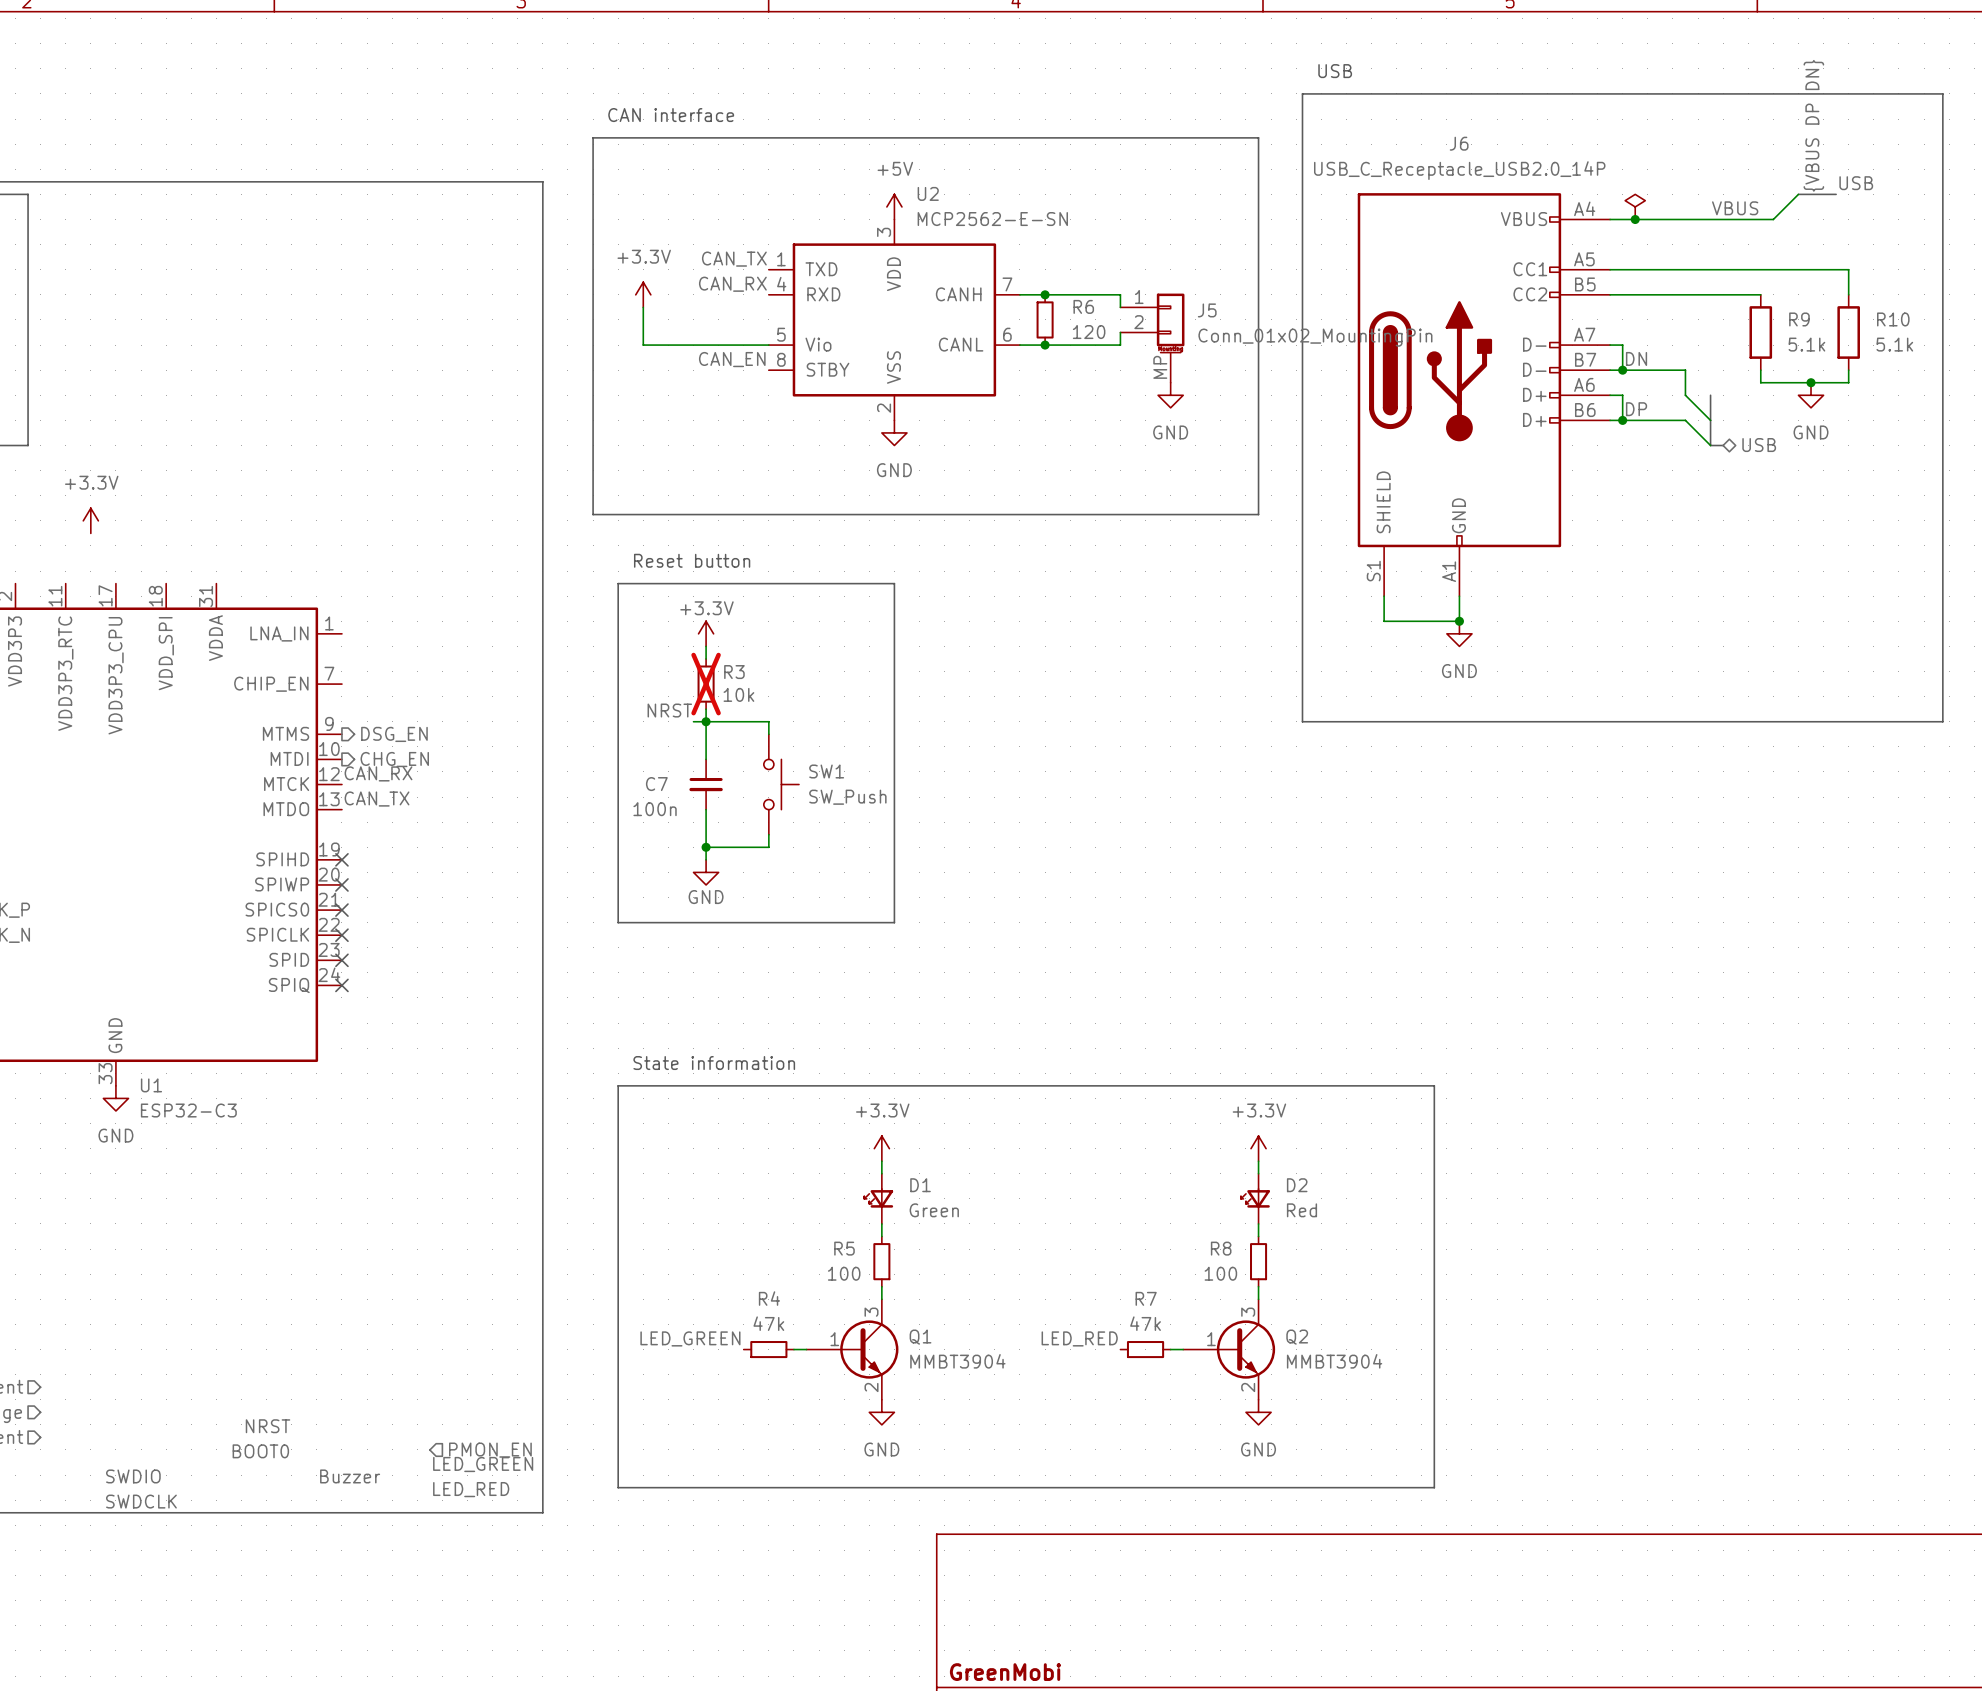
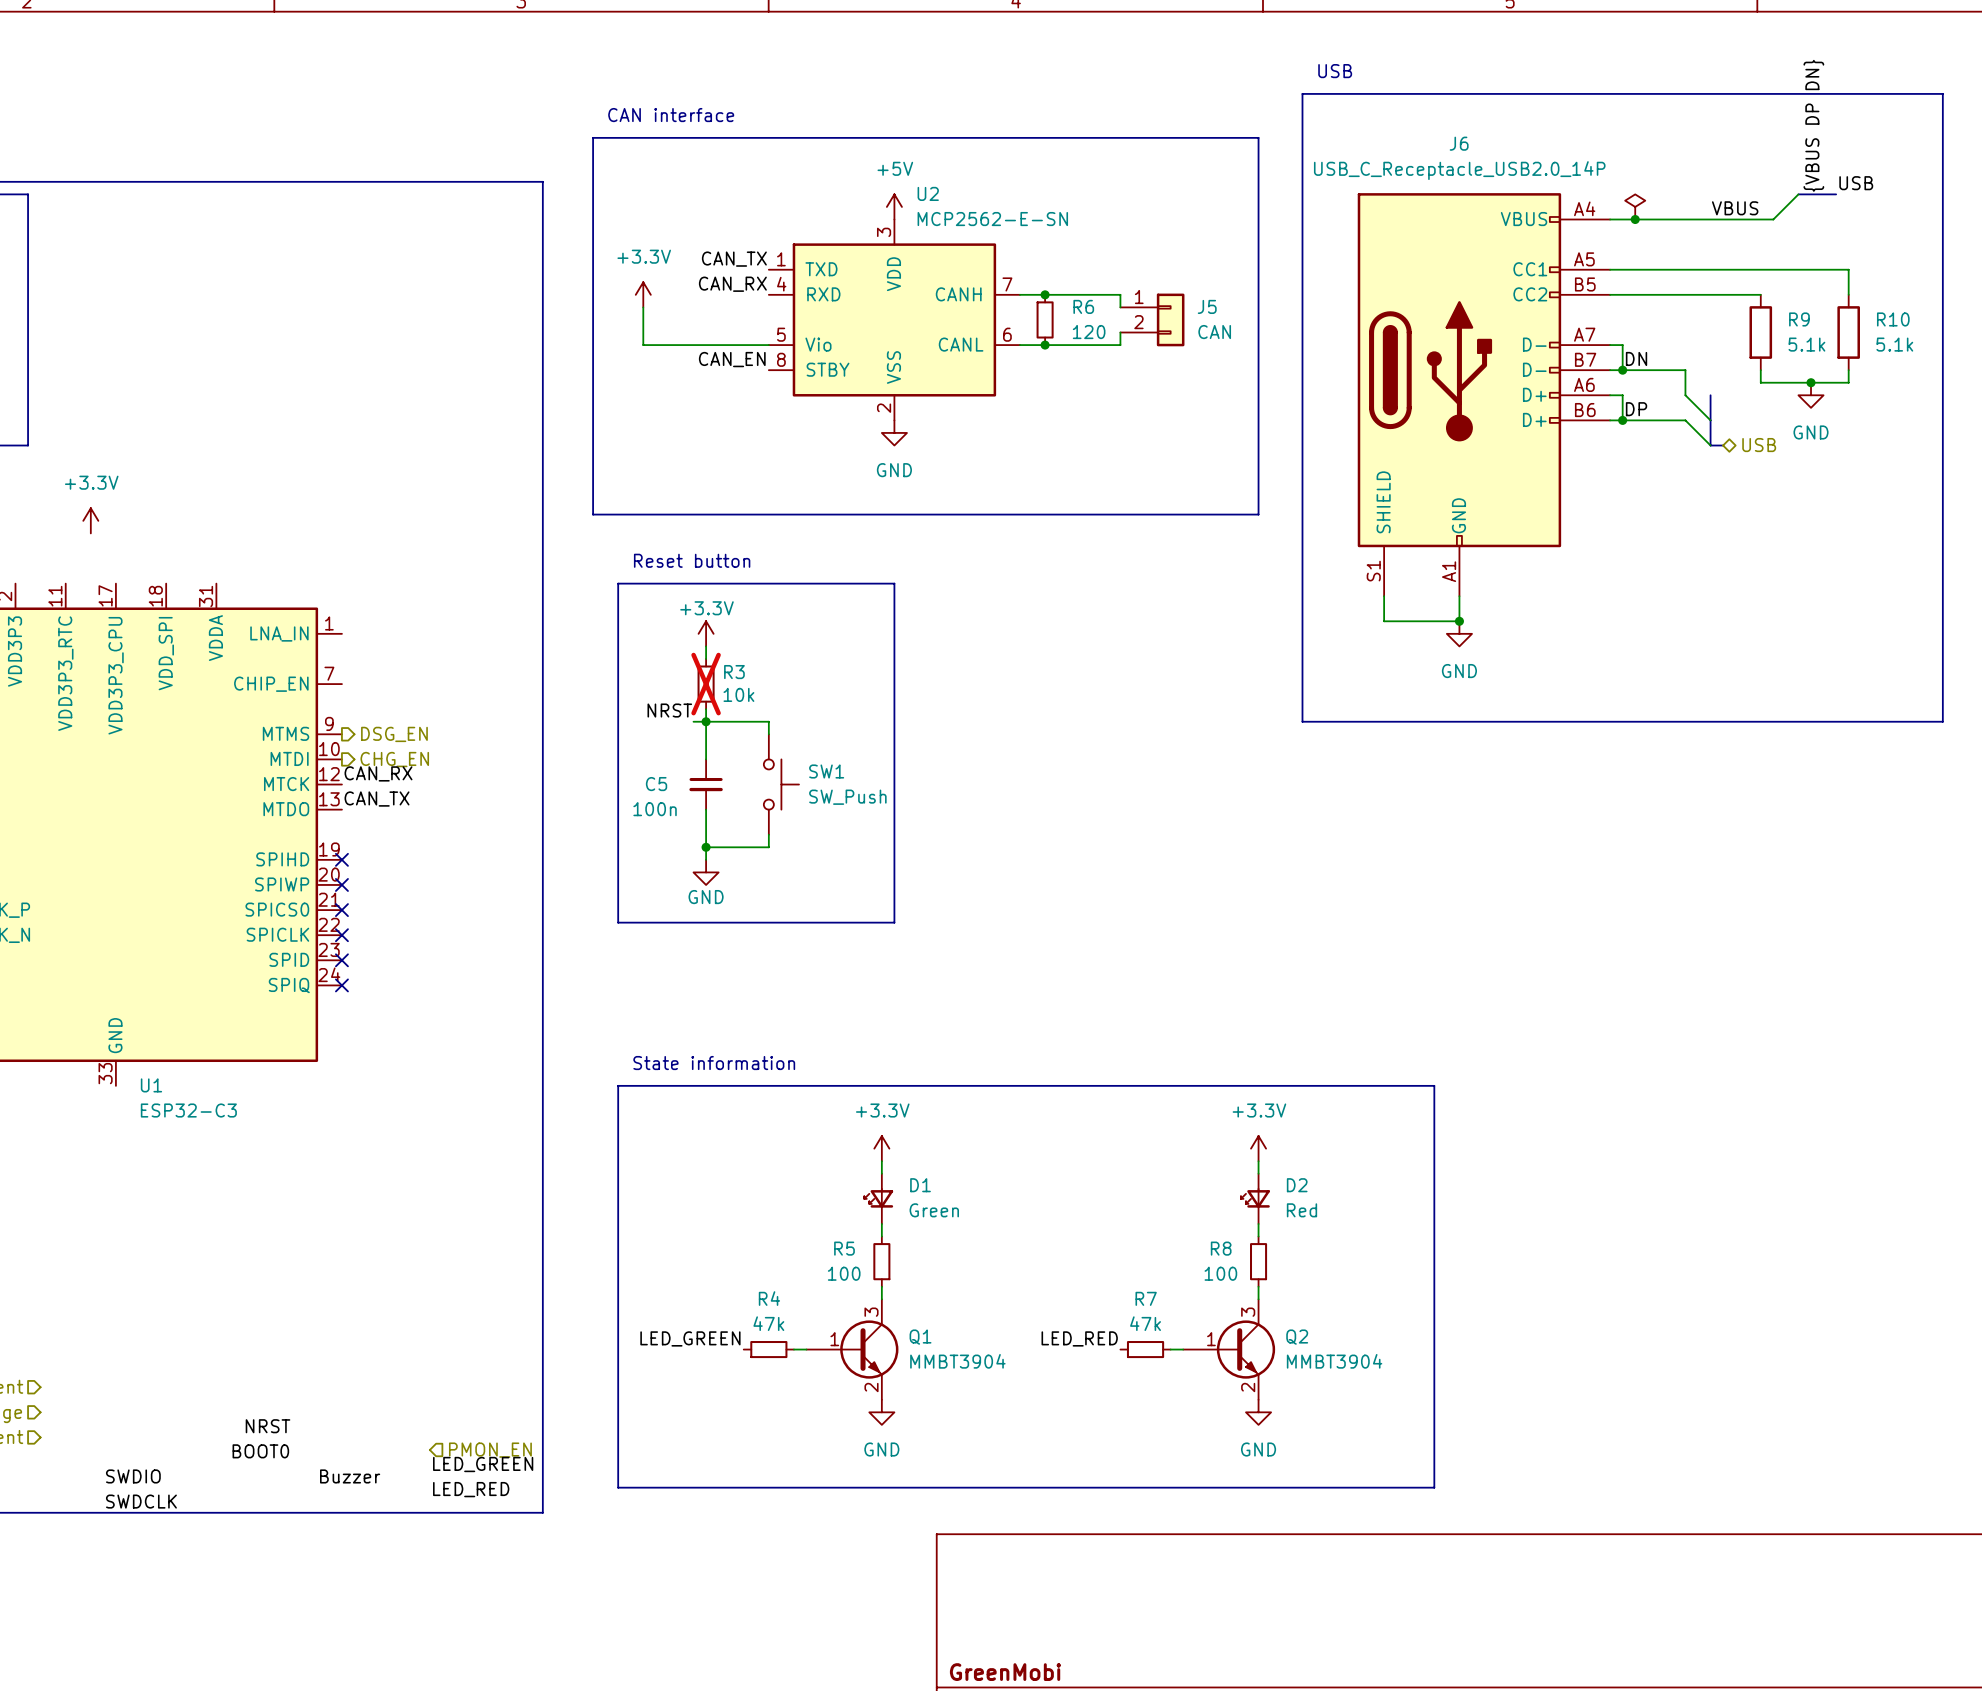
J5 symbol: [1120, 293, 1185, 383] -> [1120, 293, 1185, 347]
J5 value: Conn_01x02_MountingPin (1315, 337) -> CAN (1214, 332)
power symbol: GND (1170, 395) -> none
C7 name: C7 (656, 784) -> C5 (656, 784)
power symbol: GND (115, 1098) -> none

